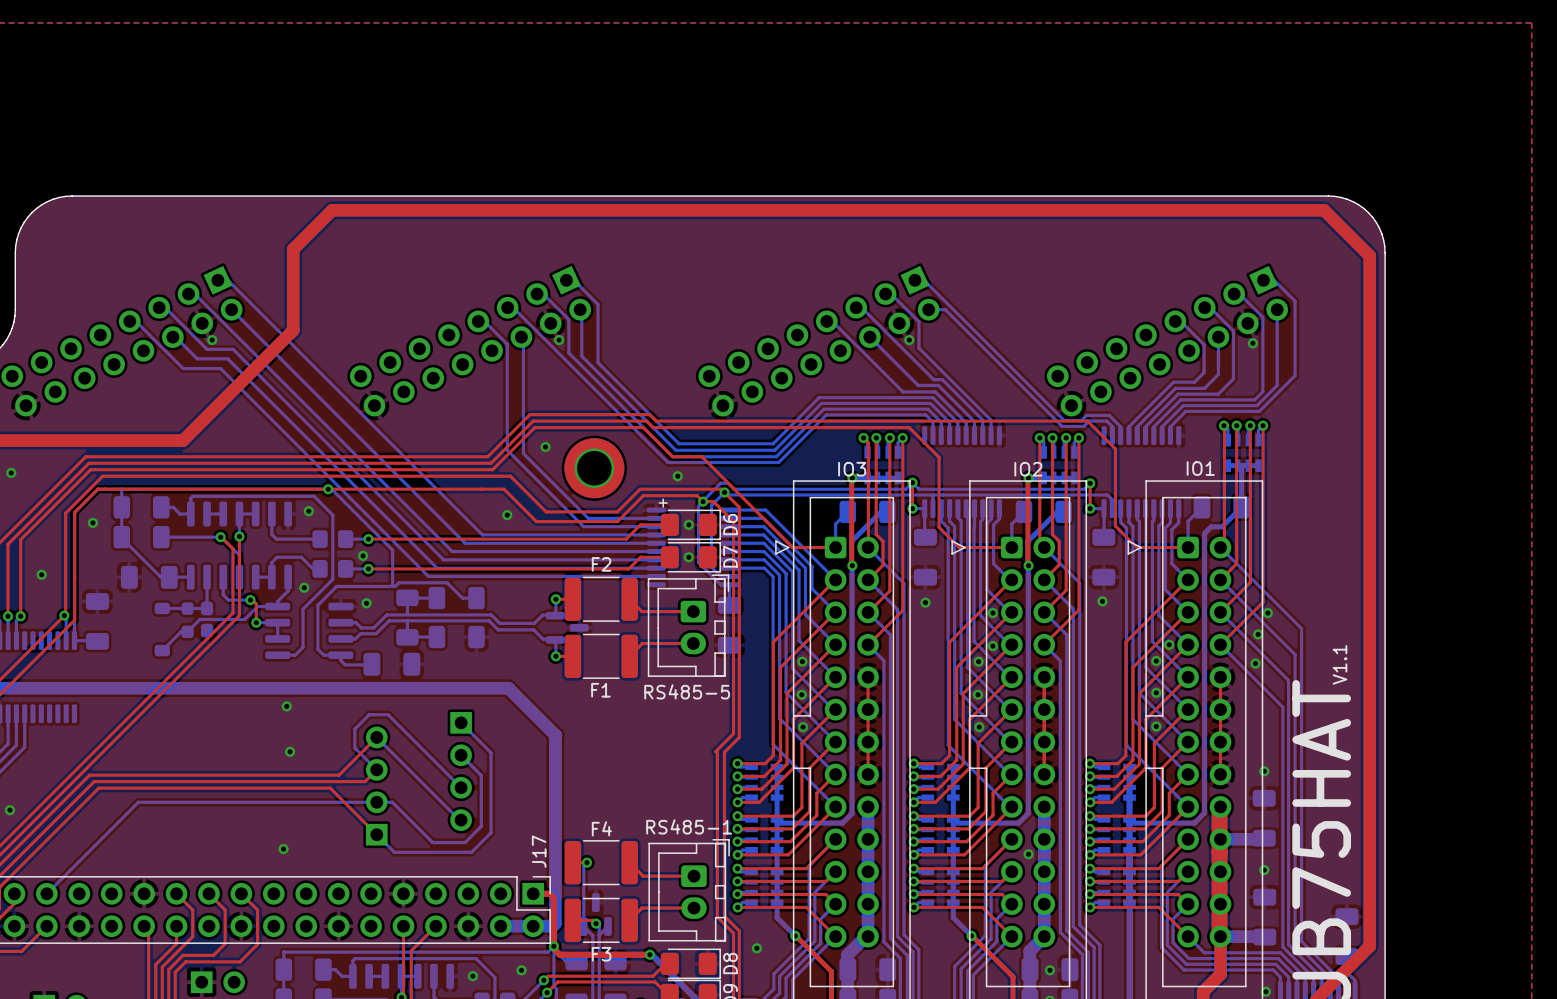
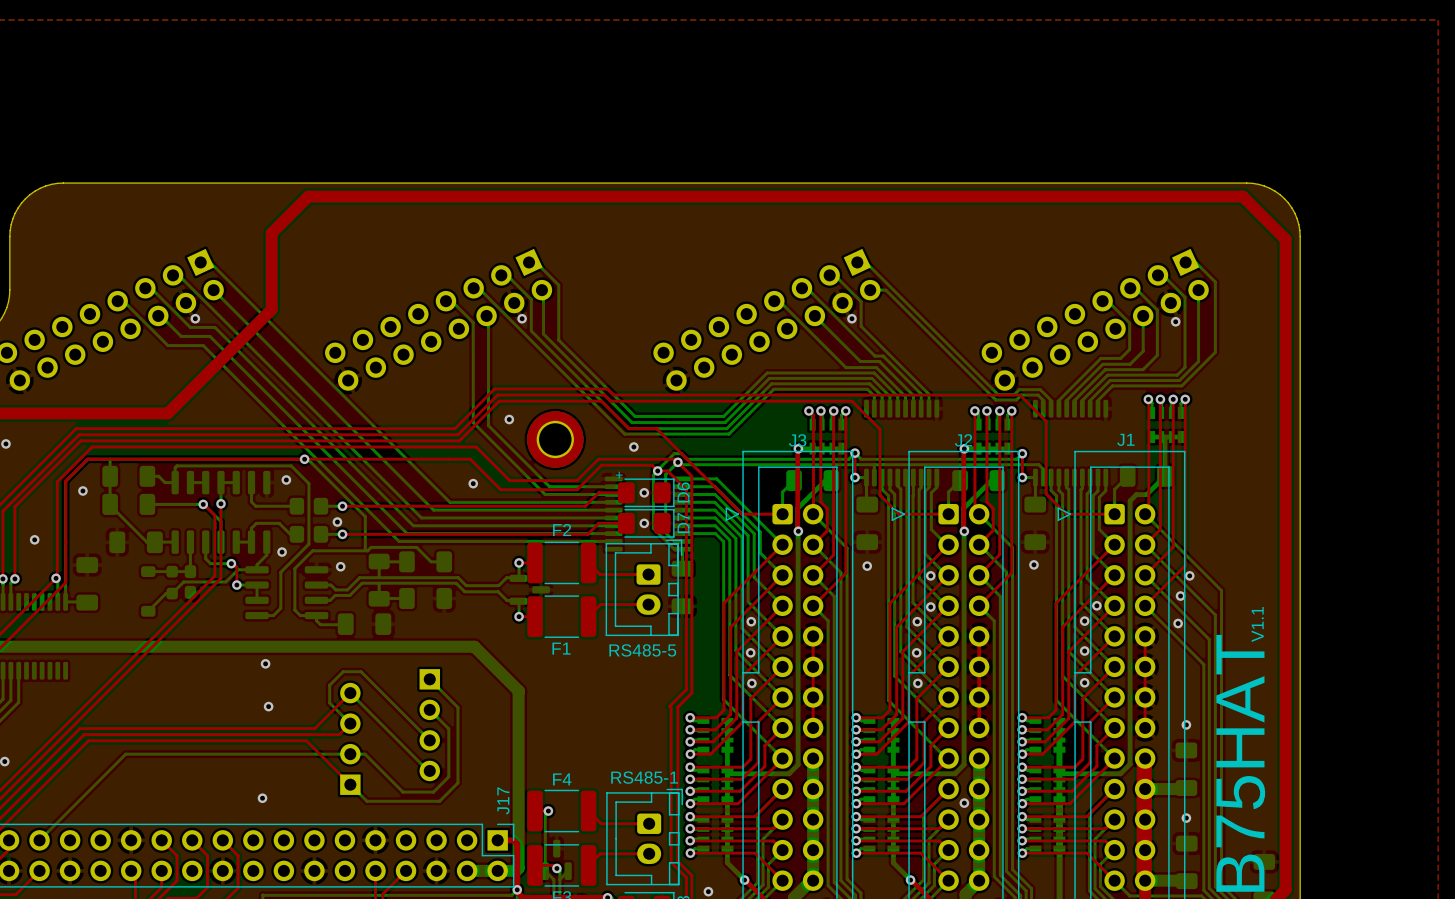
IO1 name: IO1 (1200, 468) -> J1 (1125, 439)
IO3 name: IO3 (852, 469) -> J3 (797, 440)
IO2 name: IO2 (1028, 469) -> J2 (963, 440)

